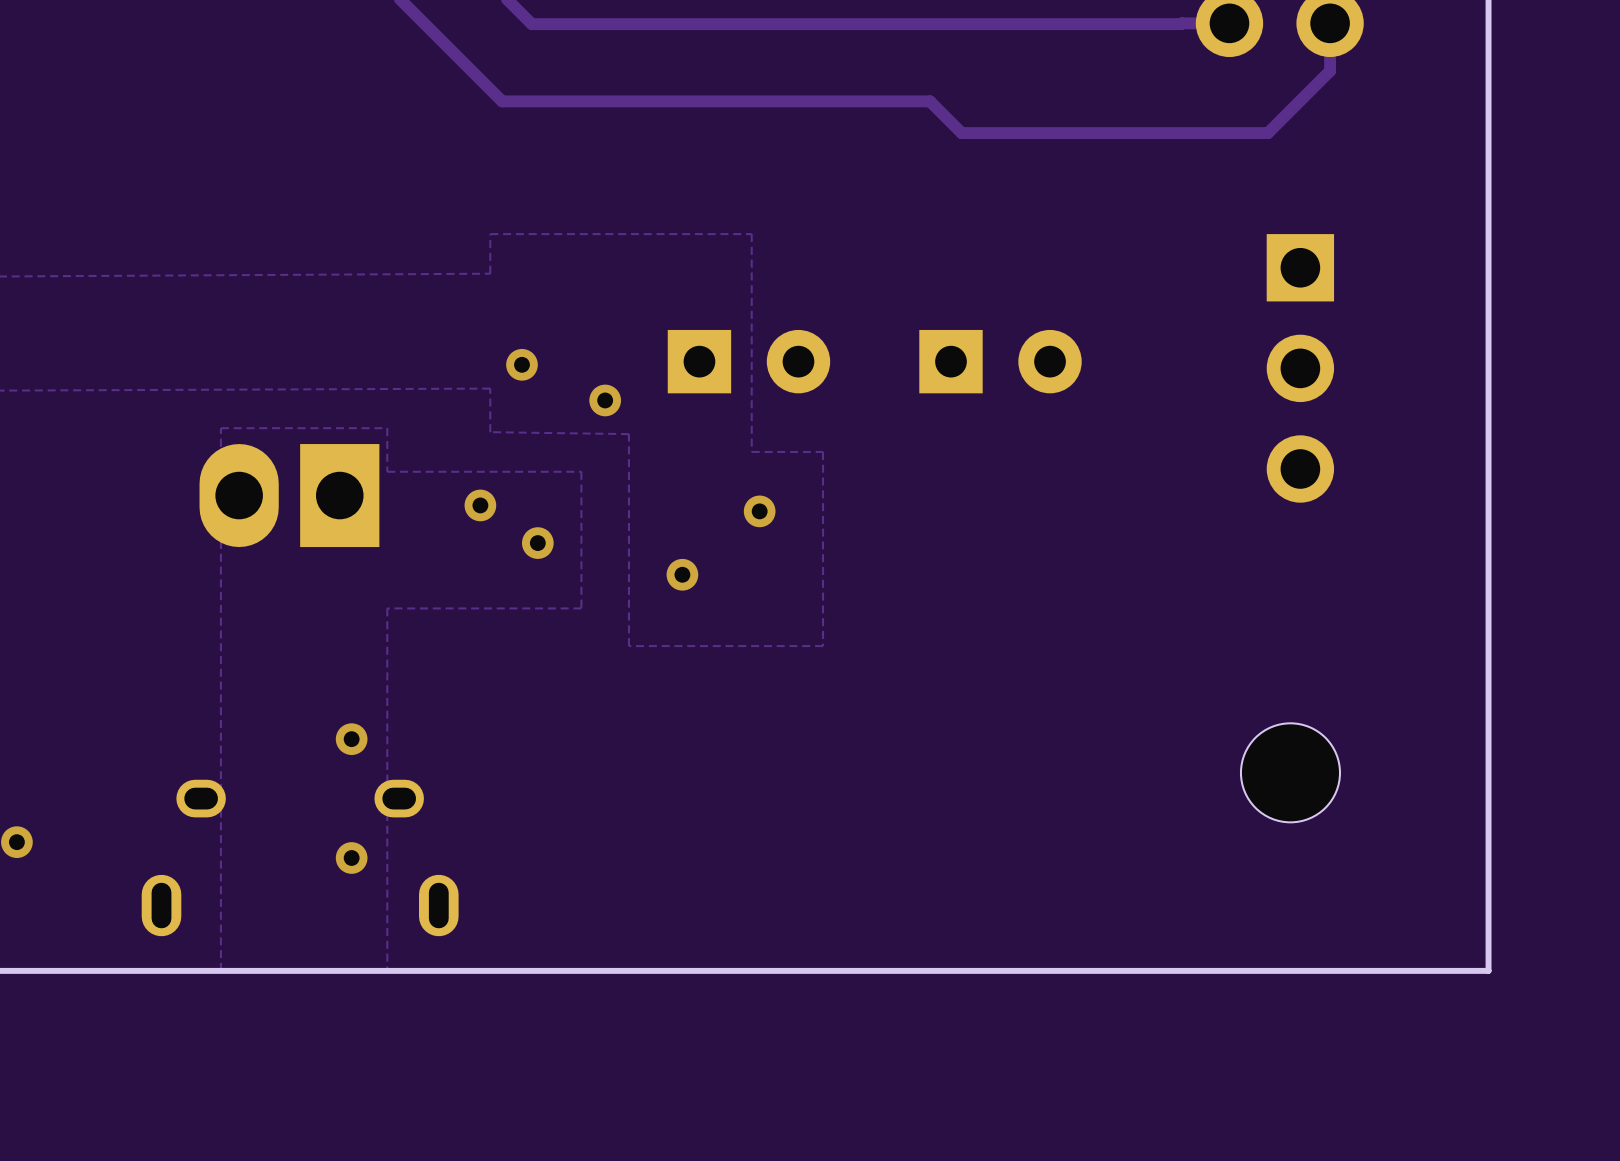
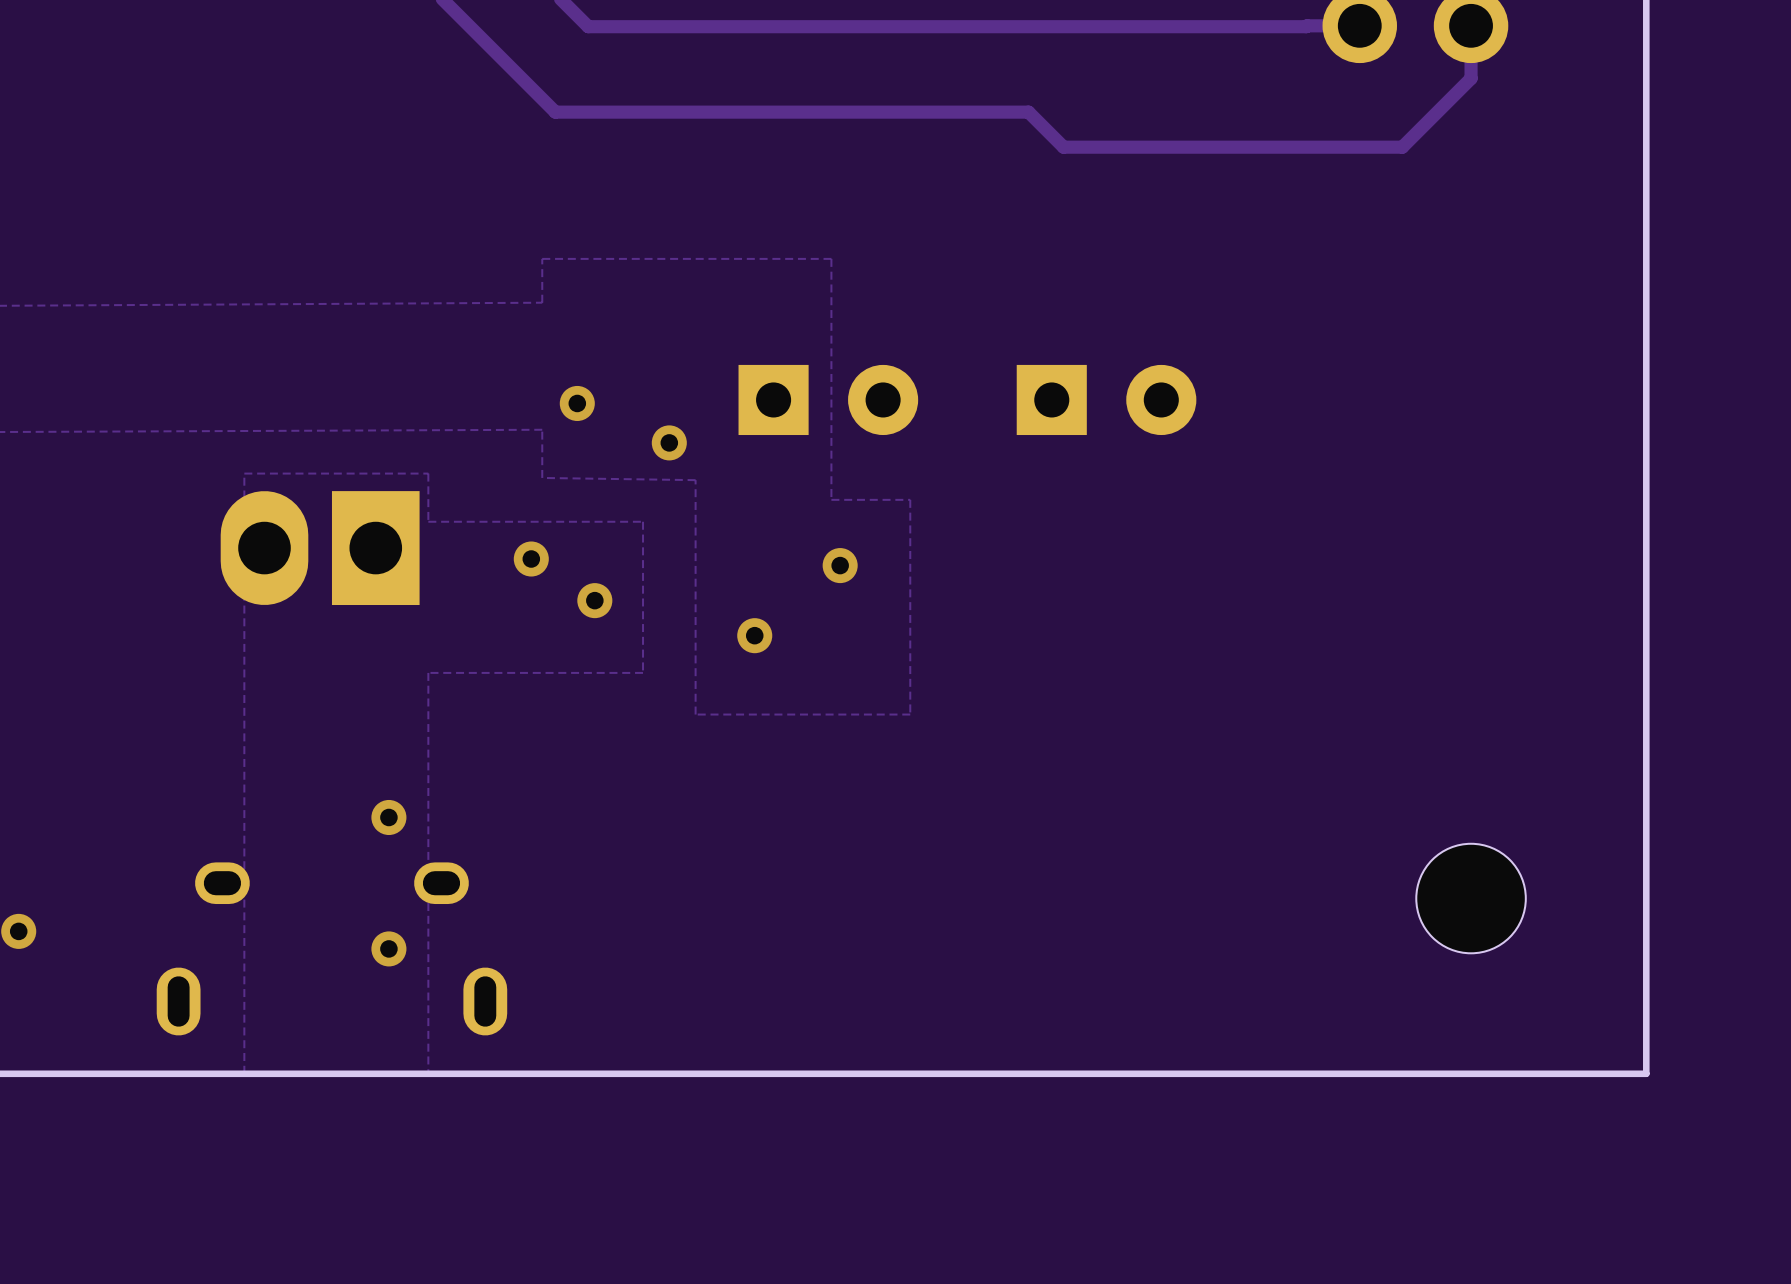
part: (1300, 368) -> none
part position: (1290, 772) -> (1471, 898)

